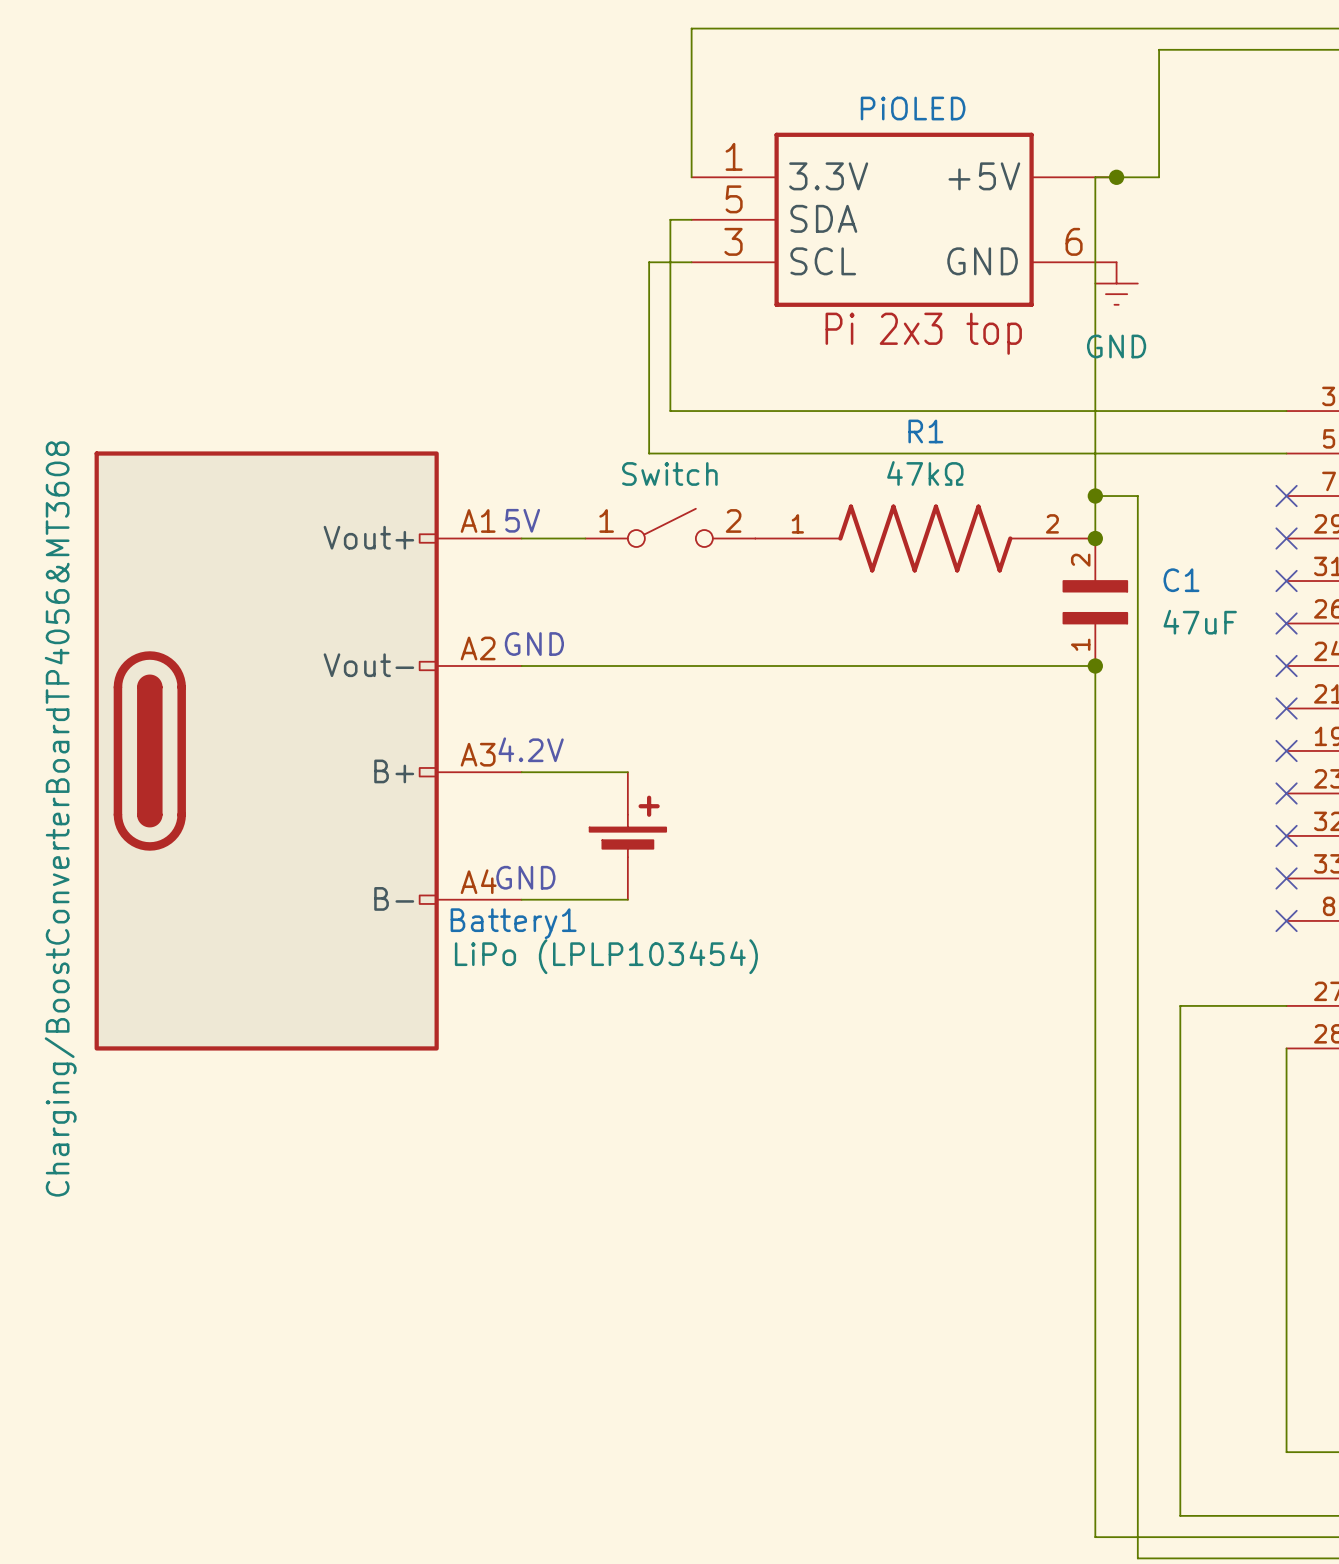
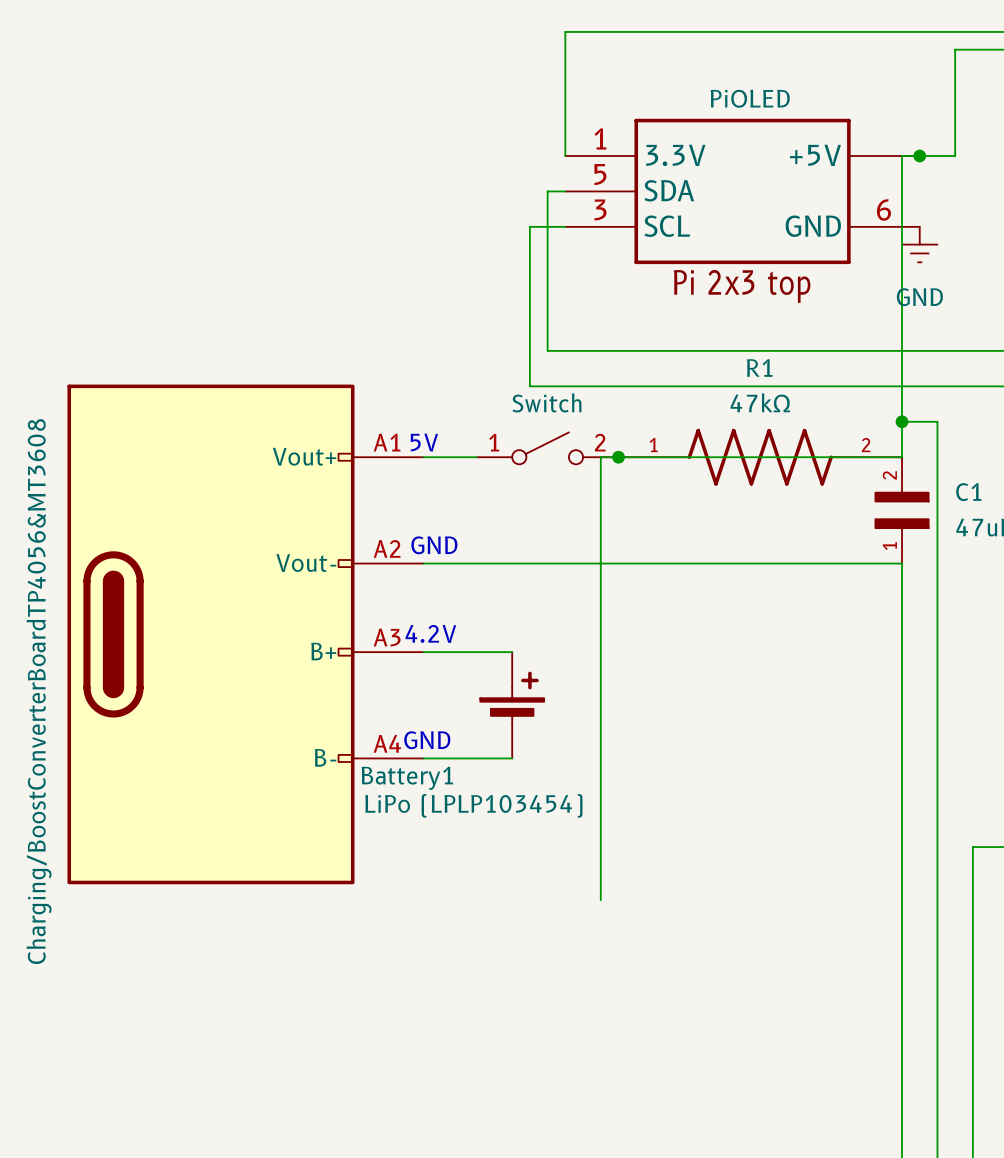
junction: none -> (618, 457)
wire: none -> (902, 457) (600, 457) (600, 900)
junction: (1095, 538) -> none
junction: (1095, 665) -> none

